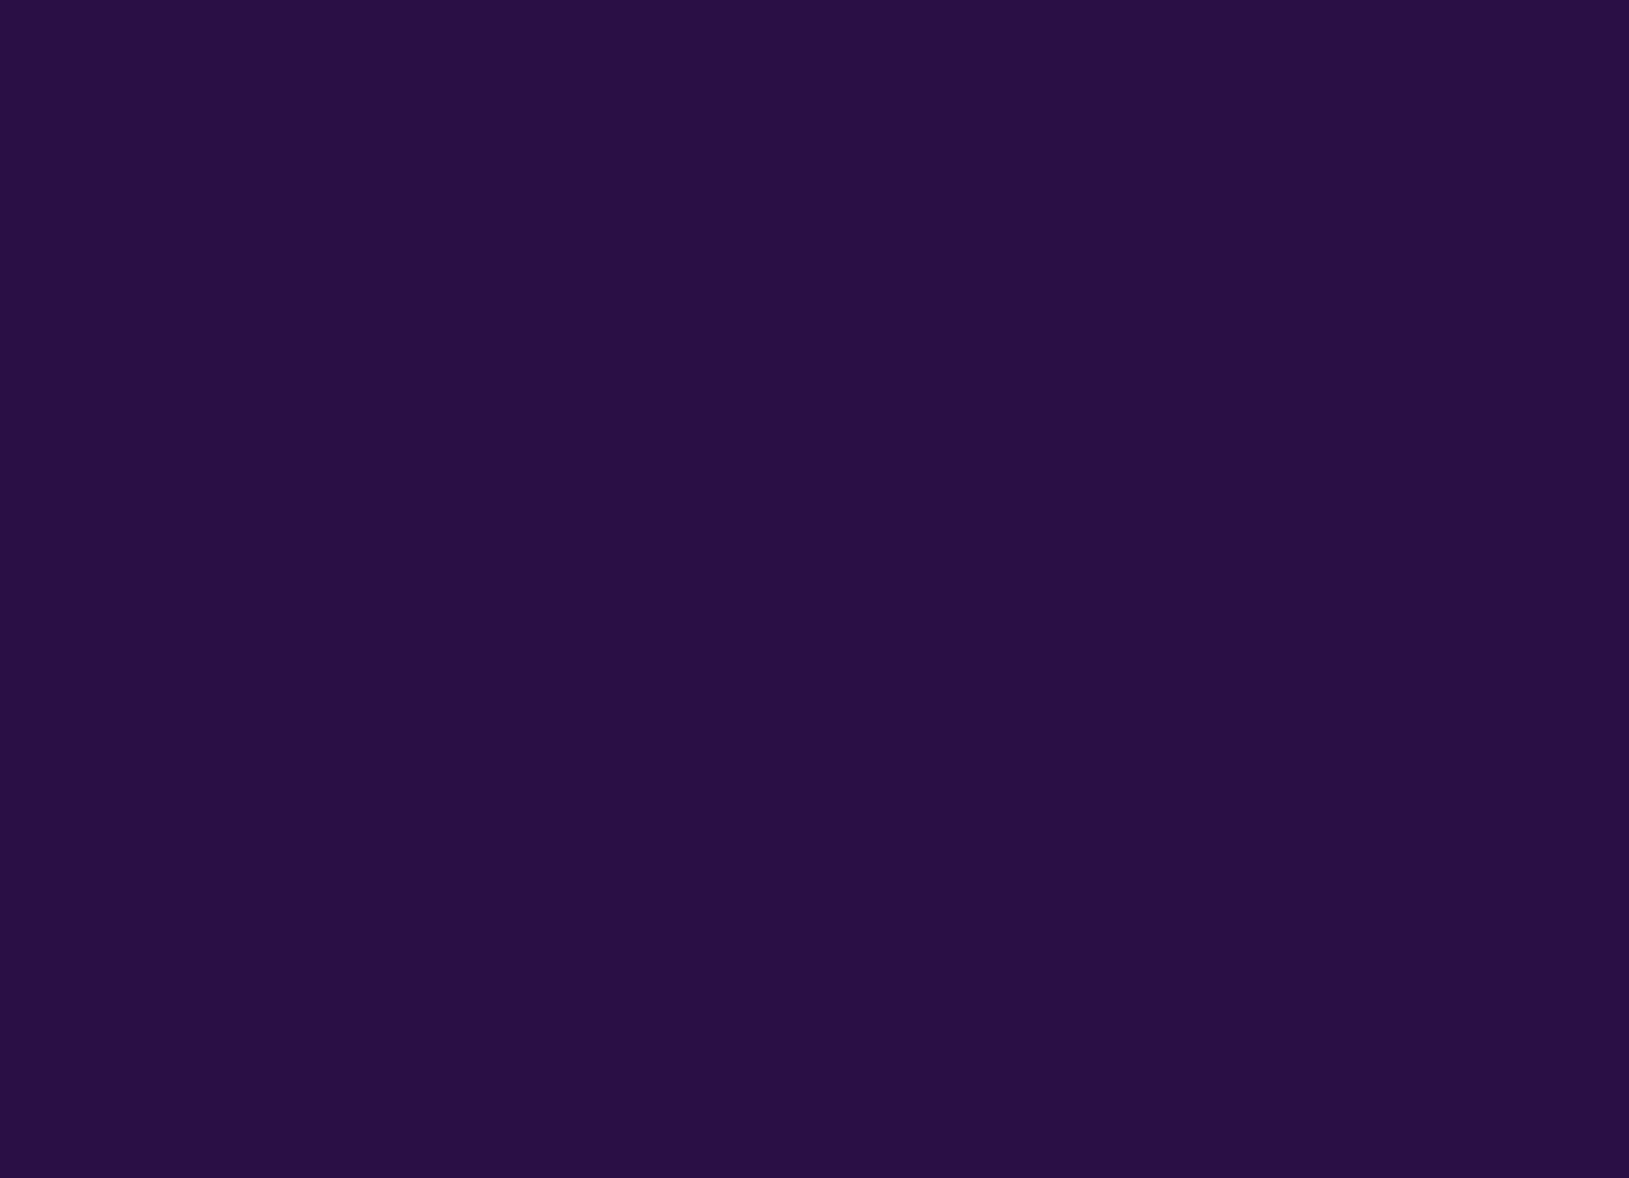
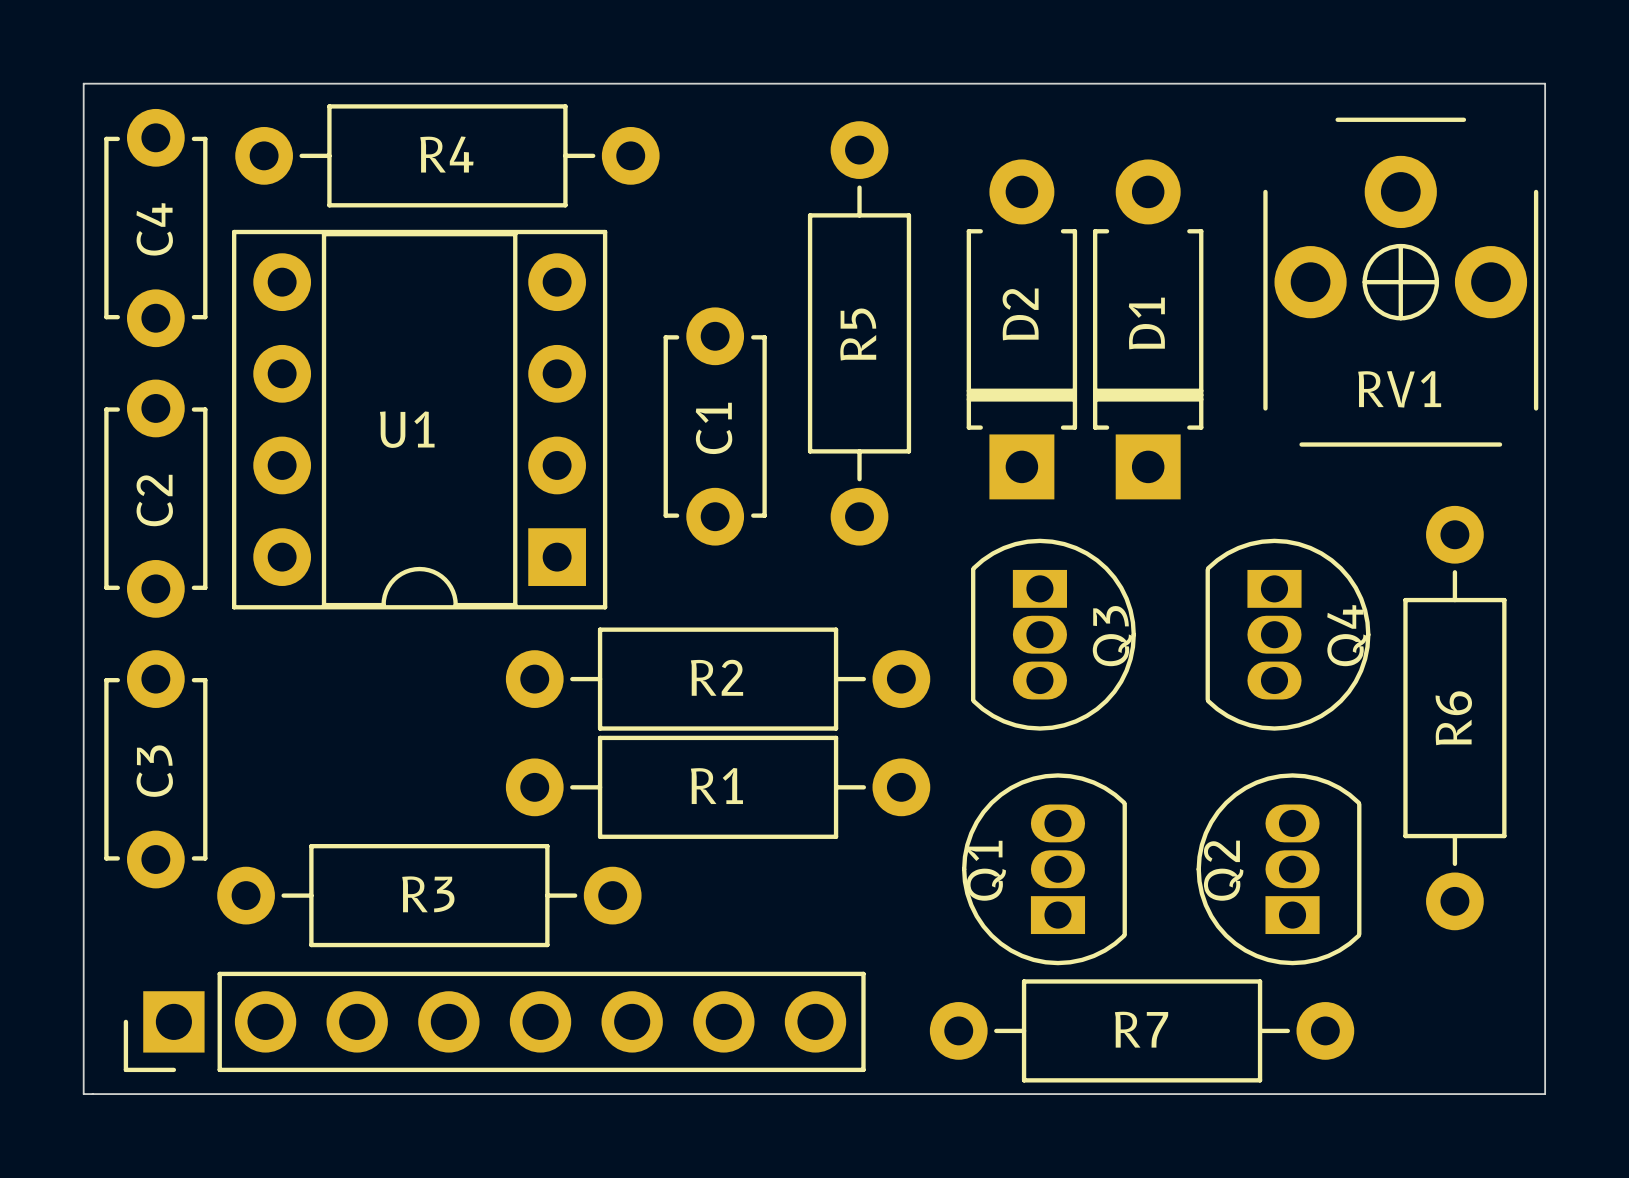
board edge: none -> (83, 83) (83, 1094) (1545, 1094) (1545, 83) (83, 83)
R4: none -> (447, 155)
C4: none -> (155, 228)
RV1: none -> (1400, 282)
D2: none -> (1021, 329)
D1: none -> (1148, 329)
R5: none -> (859, 333)
U1: none -> (419, 419)
C1: none -> (715, 426)
C2: none -> (155, 498)
Q3: none -> (1053, 634)
Q4: none -> (1288, 634)
R2: none -> (718, 679)
R6: none -> (1454, 718)
C3: none -> (155, 769)
R1: none -> (718, 787)
Q1: none -> (1044, 869)
Q2: none -> (1279, 869)
R3: none -> (429, 895)
part: none -> (494, 1021)
R7: none -> (1142, 1030)

